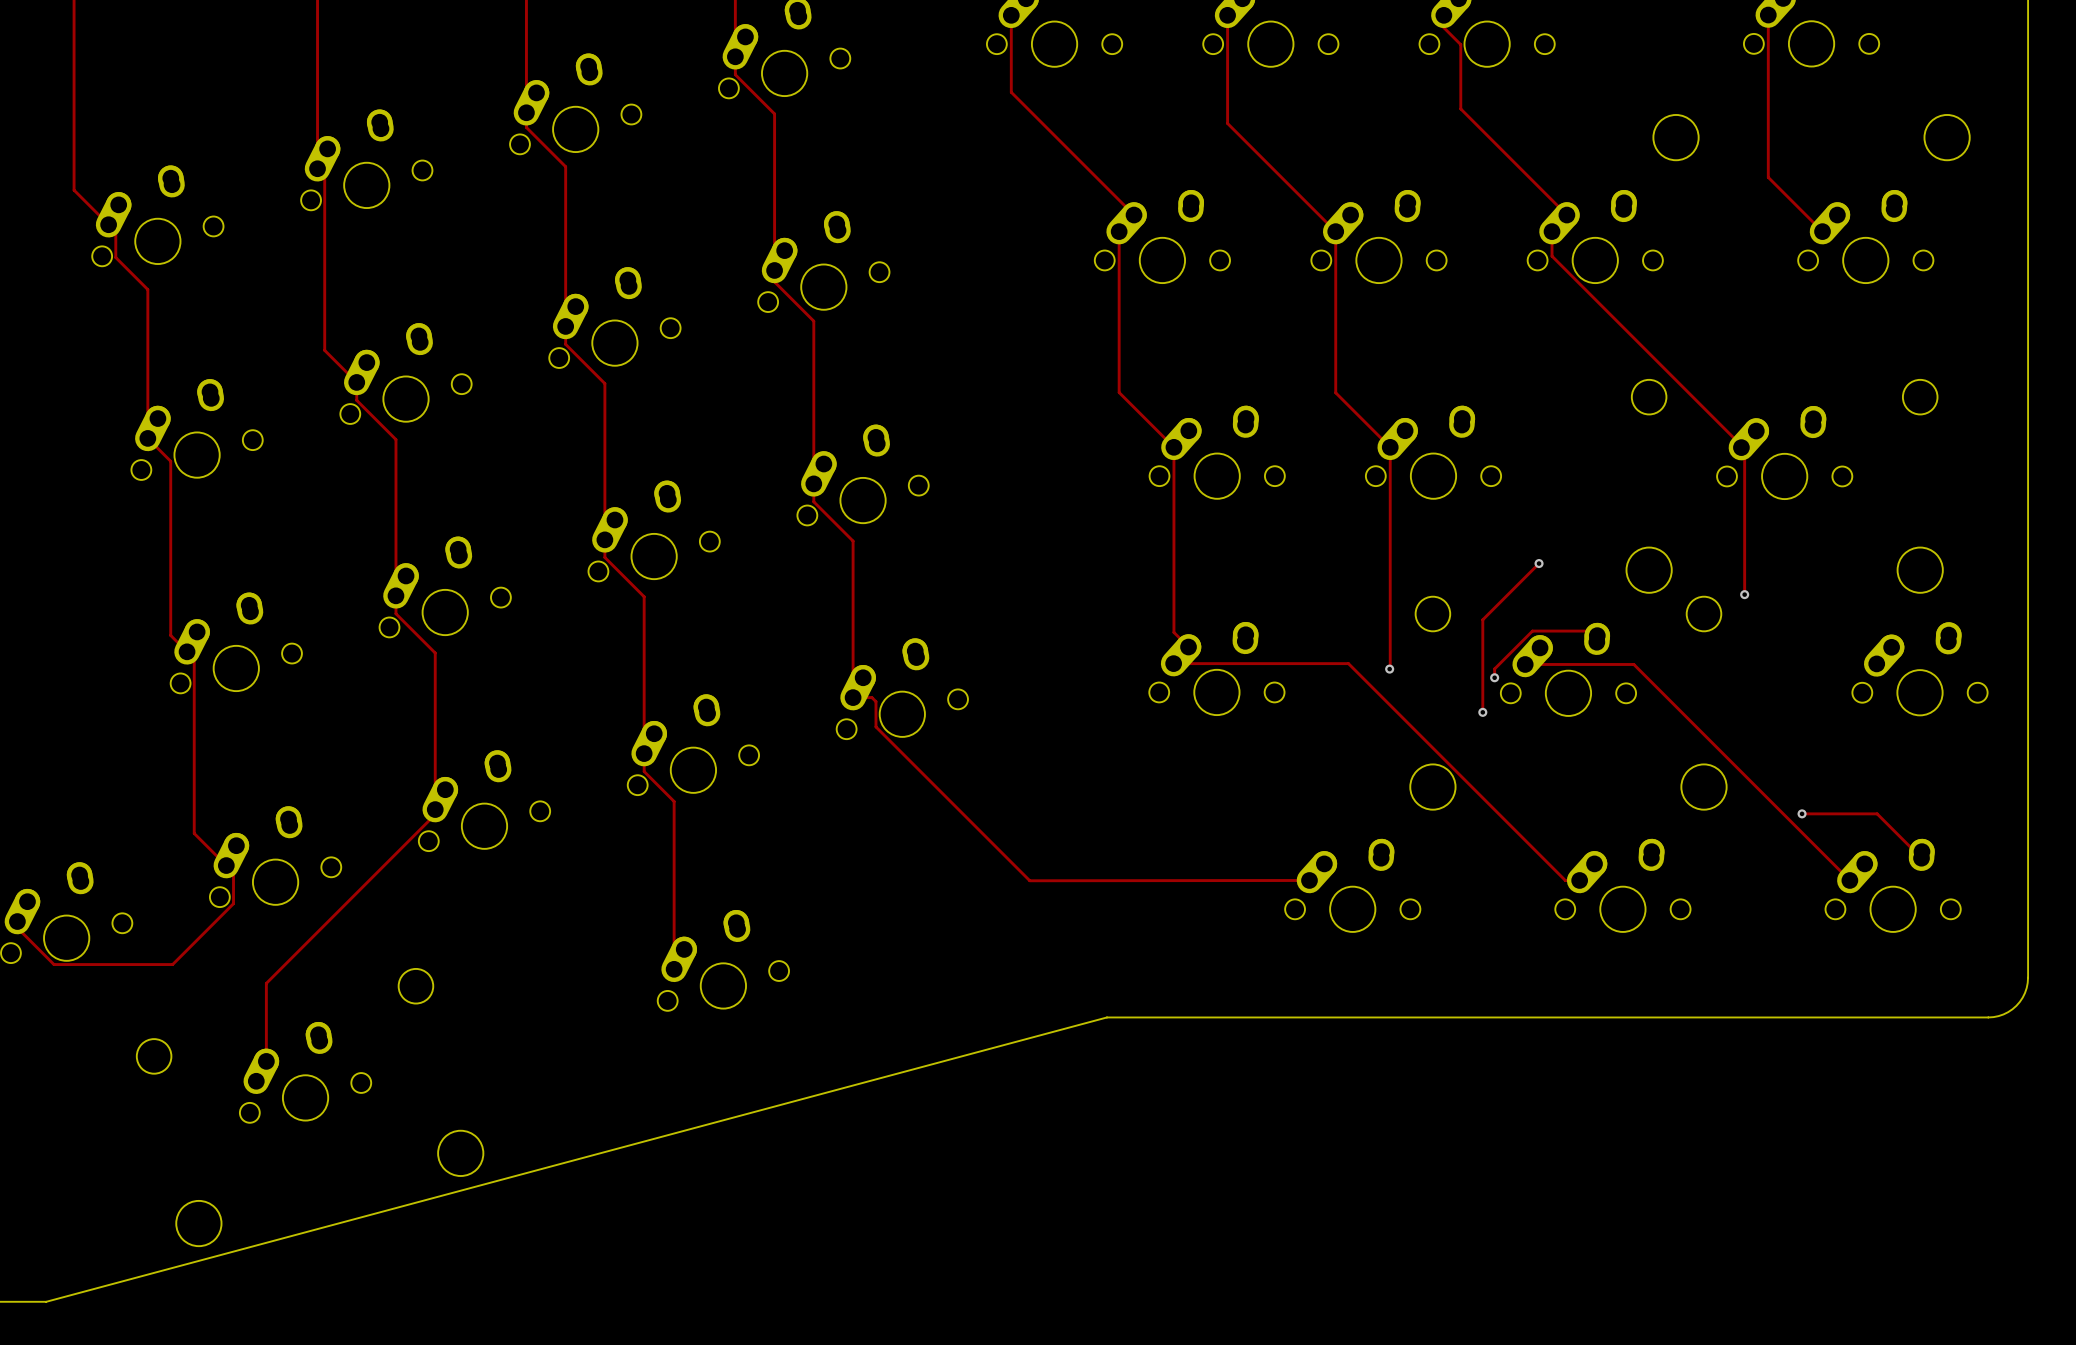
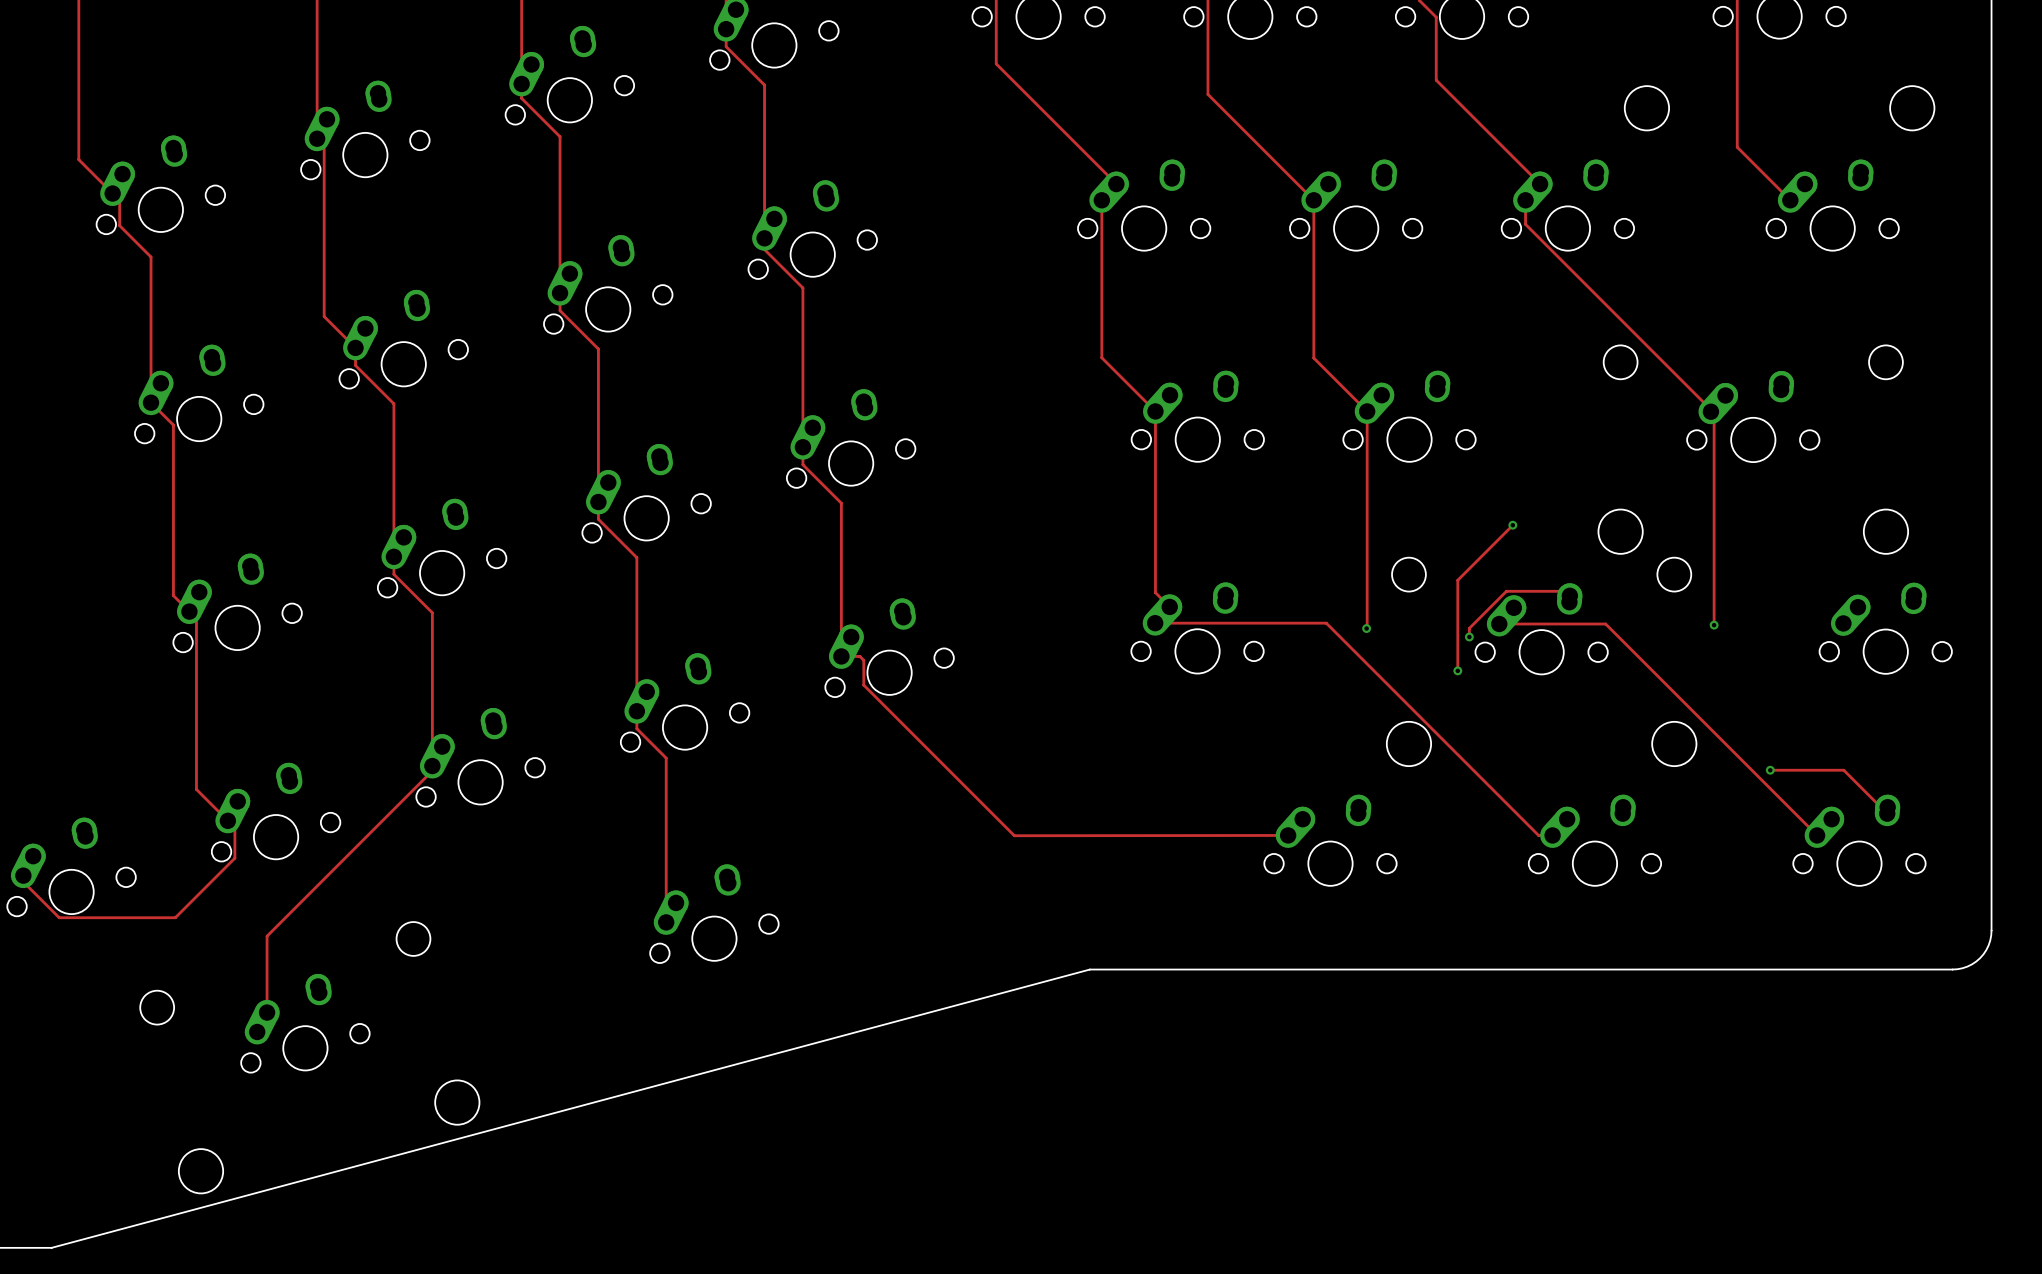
track: none -> (1714, 555) (1714, 625)
via: (1744, 594) -> none
via: none -> (1714, 625)

